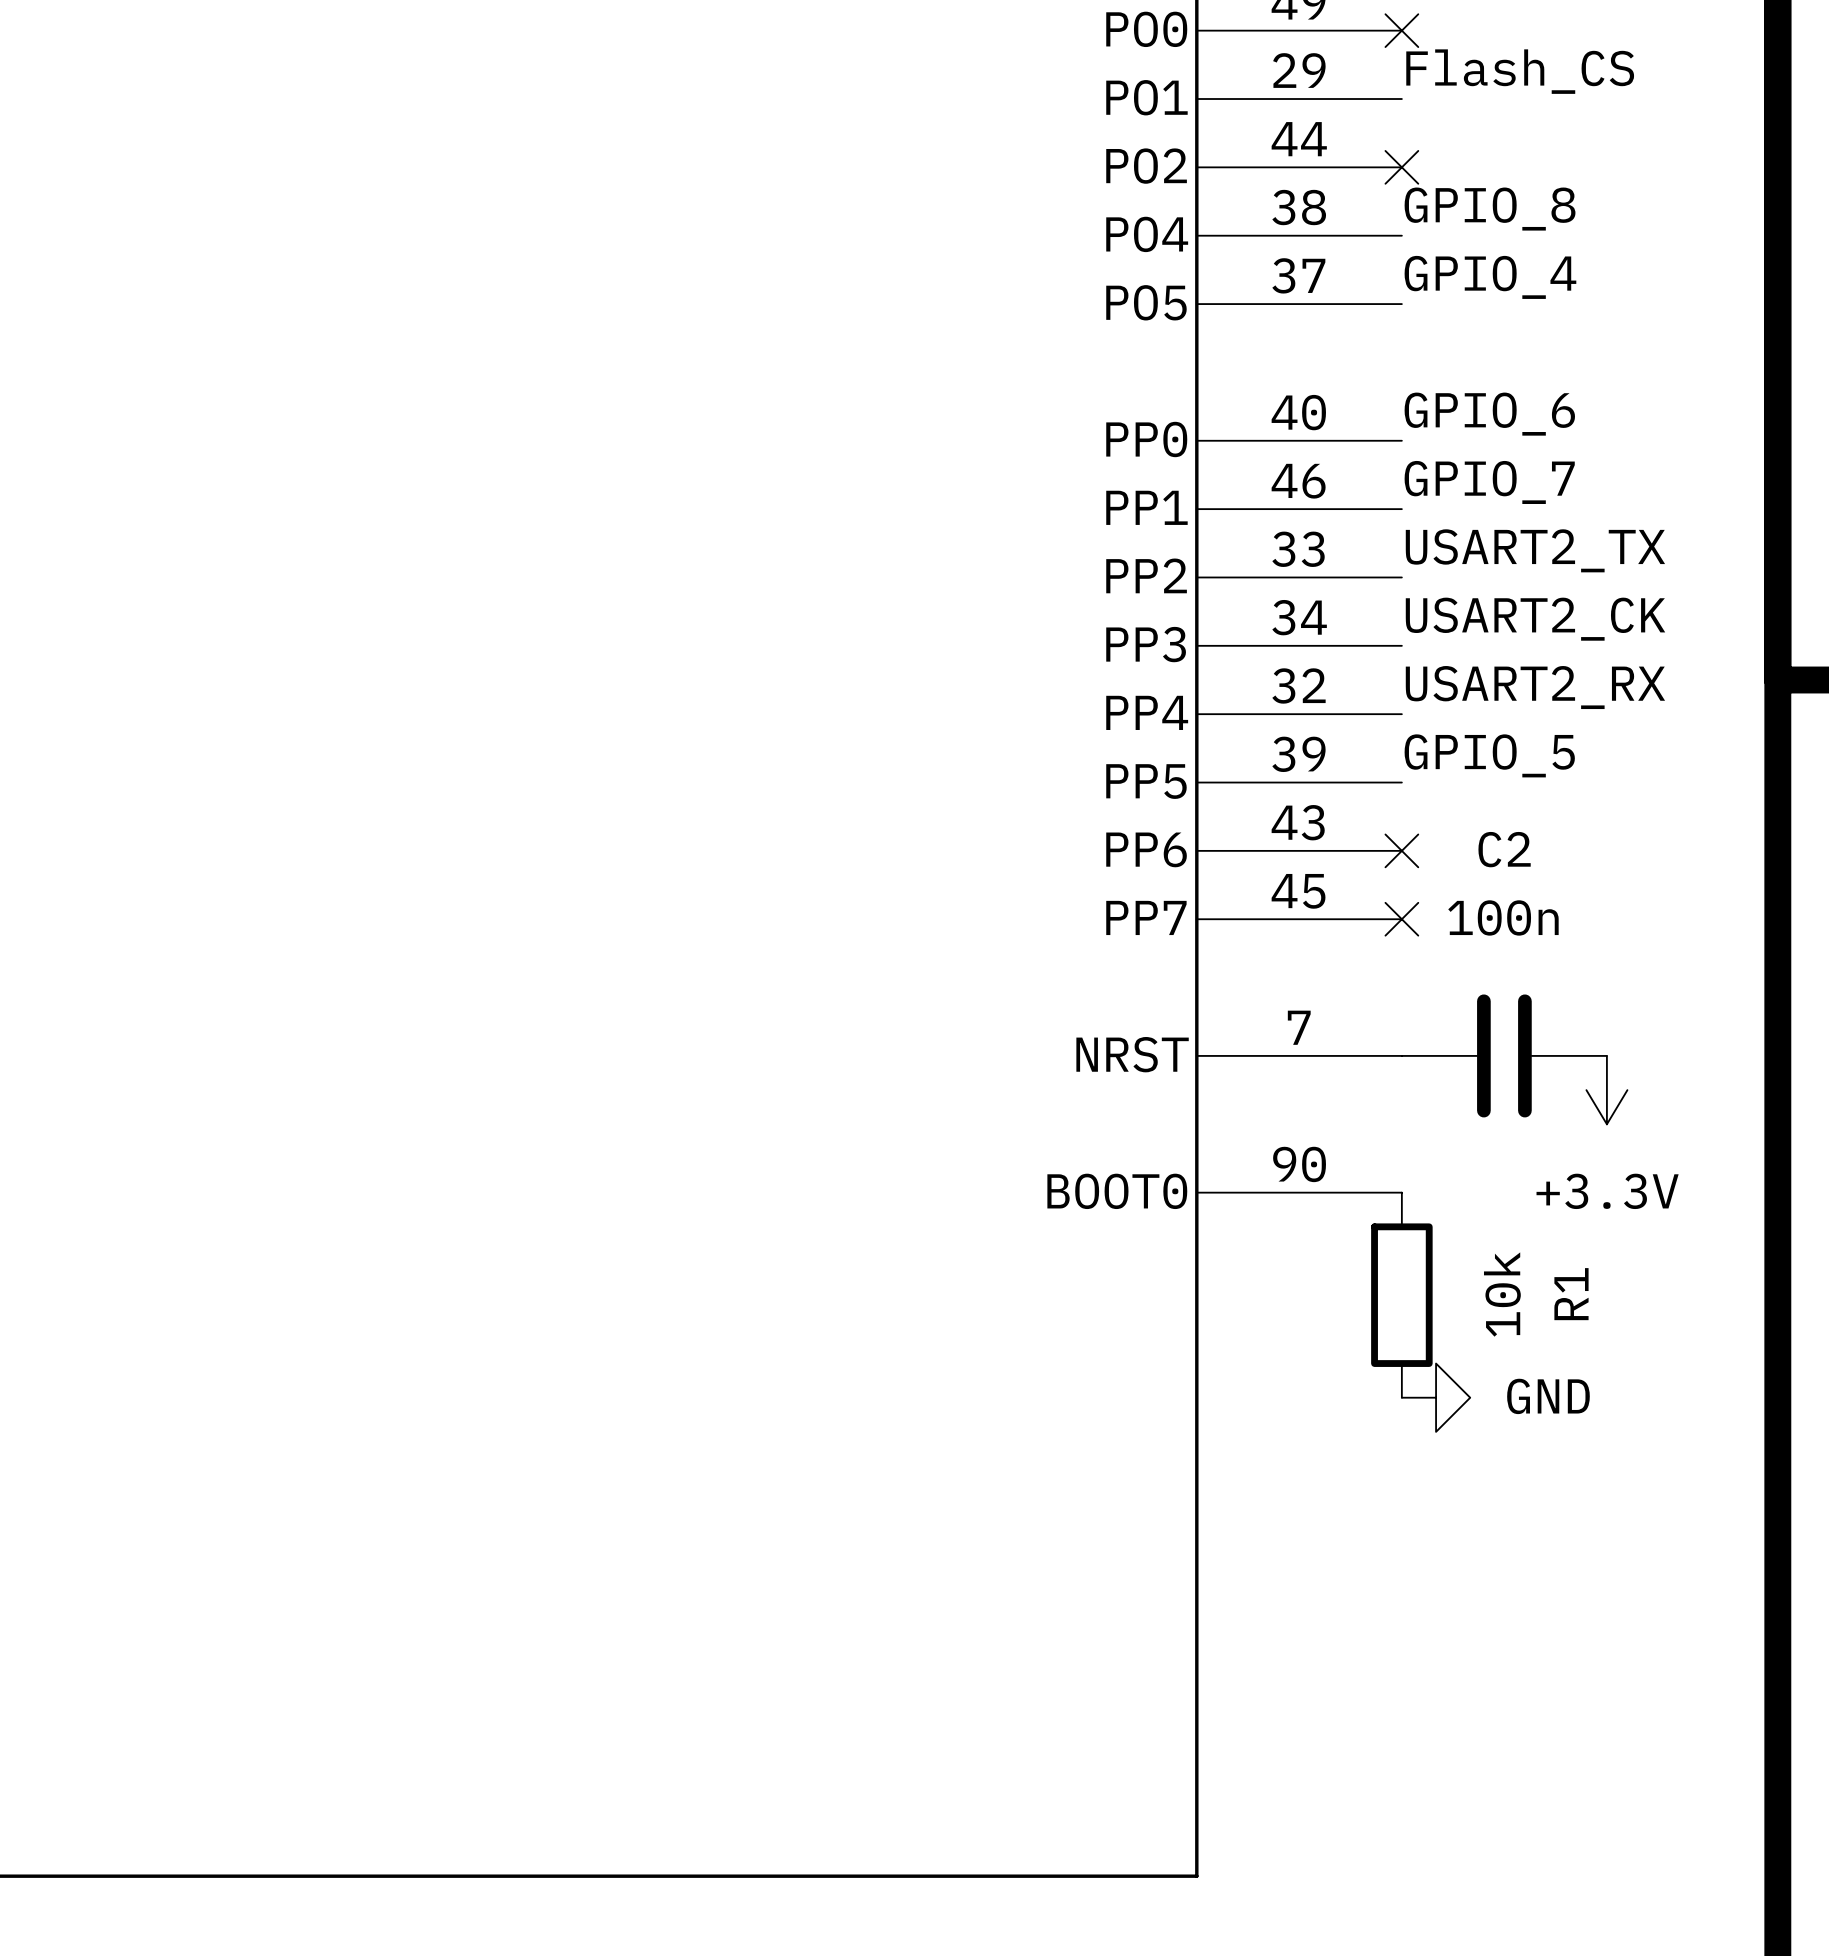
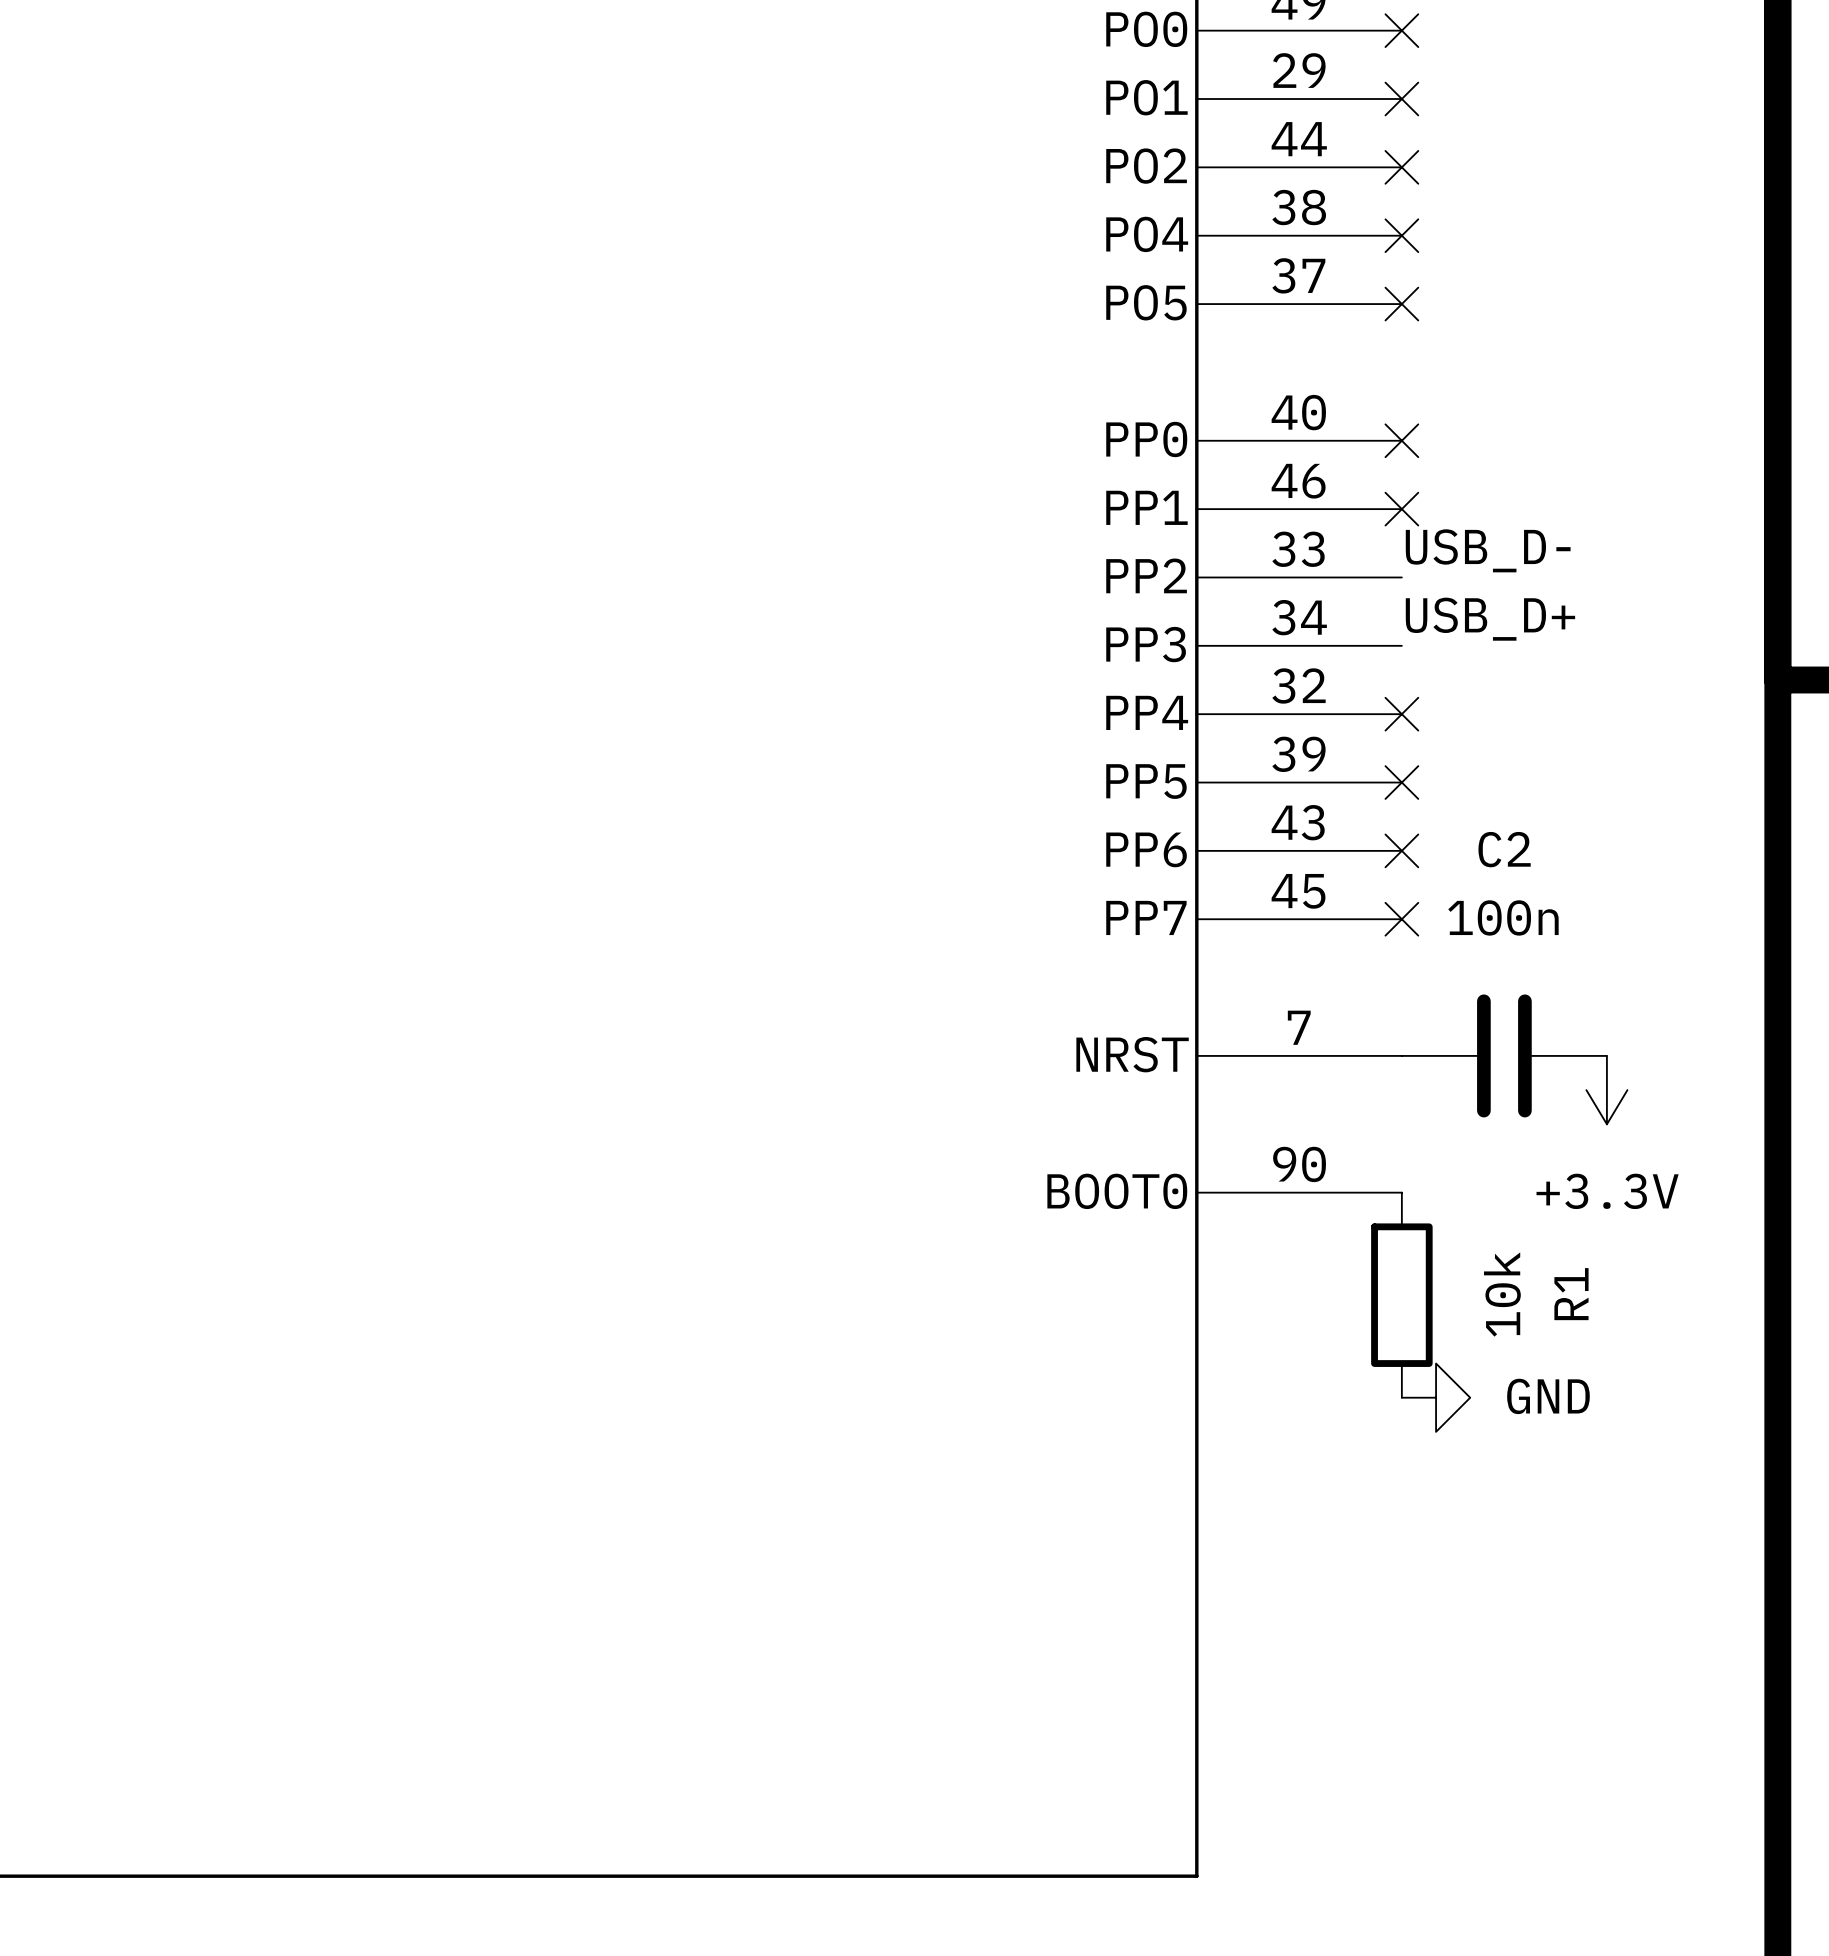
label: Flash_CS (1520, 71) -> none
no-connect mark: none -> (1401, 99)
label: GPIO_8 (1490, 209) -> none
no-connect mark: none -> (1401, 235)
label: GPIO_4 (1490, 277) -> none
no-connect mark: none -> (1401, 304)
label: GPIO_6 (1489, 414) -> none
no-connect mark: none -> (1401, 440)
label: GPIO_7 (1489, 482) -> none
no-connect mark: none -> (1401, 509)
label: USART2_TX (1535, 550) -> USB_D- (1488, 550)
label: USART2_CK (1535, 619) -> USB_D+ (1490, 619)
label: USART2_RX (1535, 687) -> none
no-connect mark: none -> (1401, 714)
label: GPIO_5 (1489, 755) -> none
no-connect mark: none -> (1401, 782)

